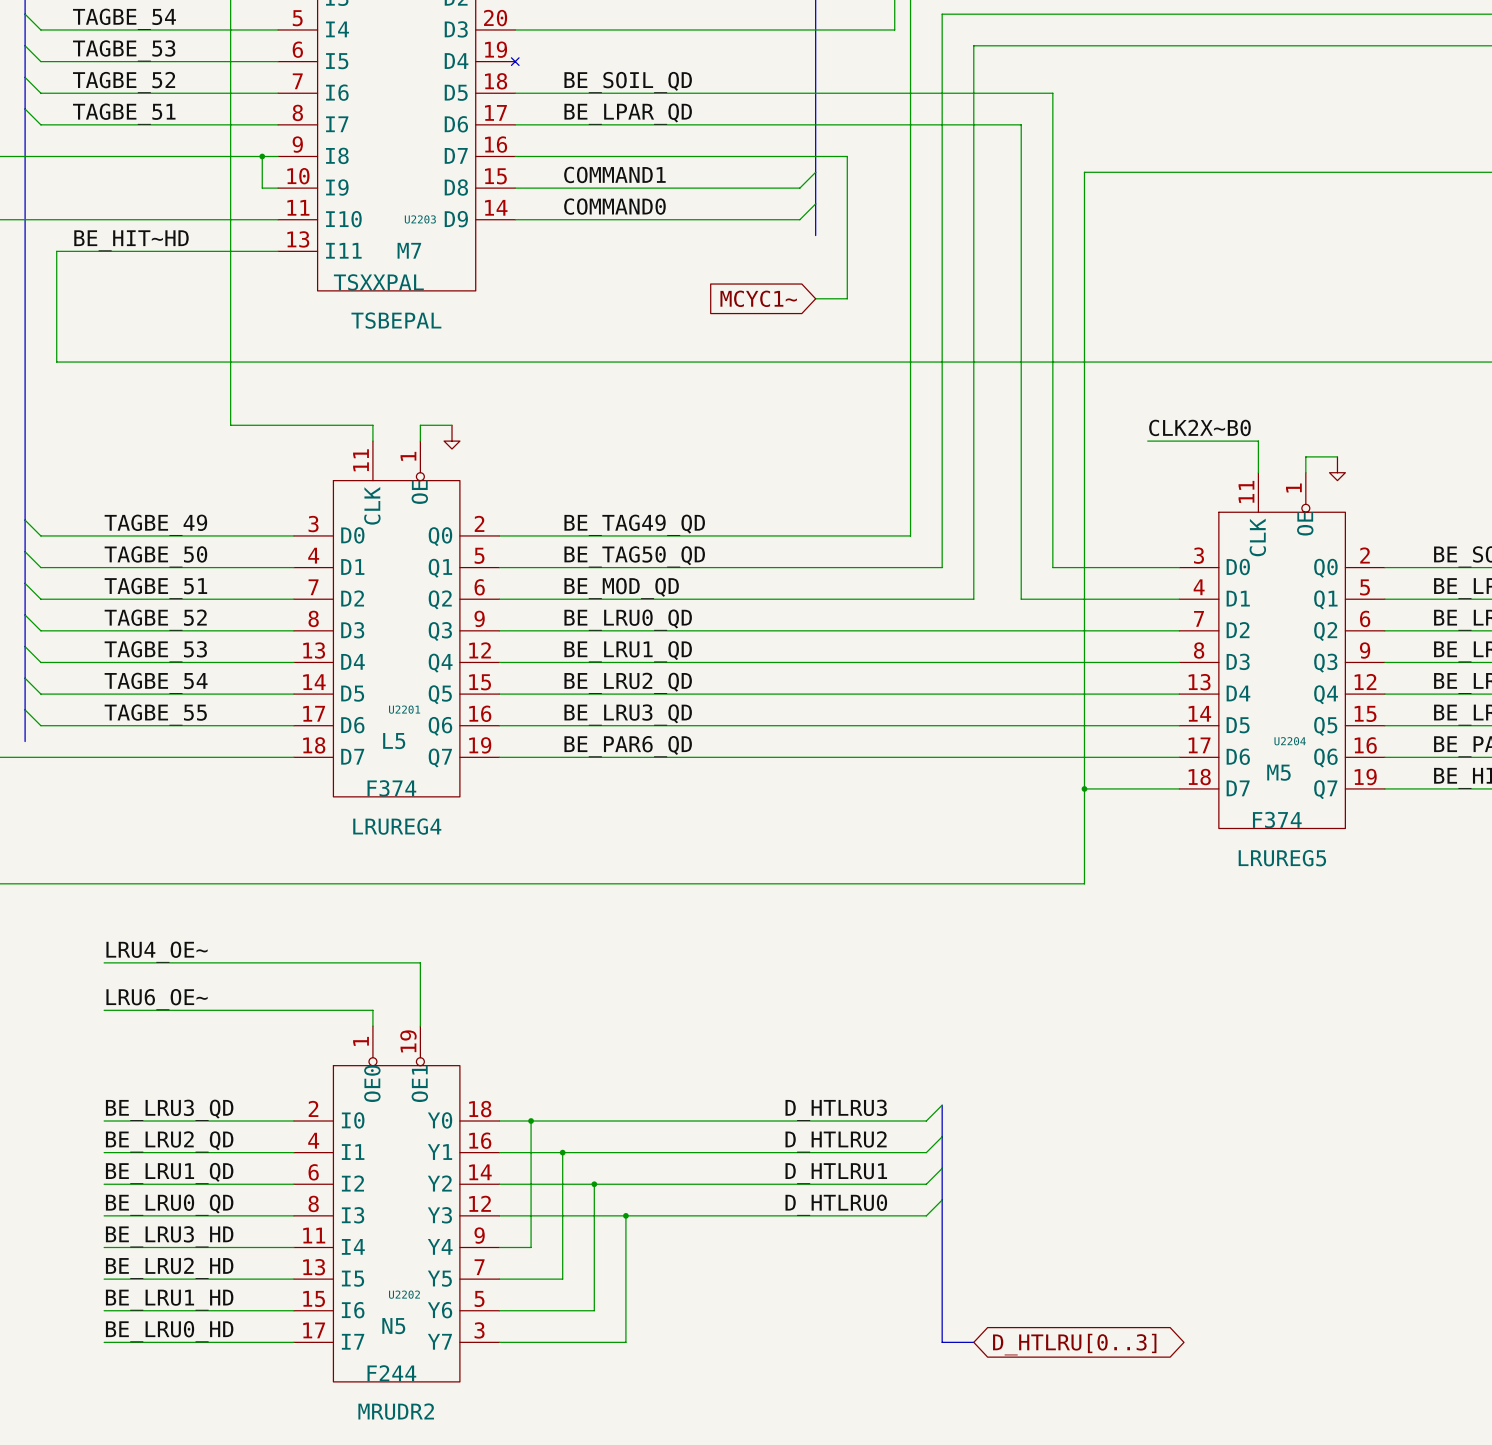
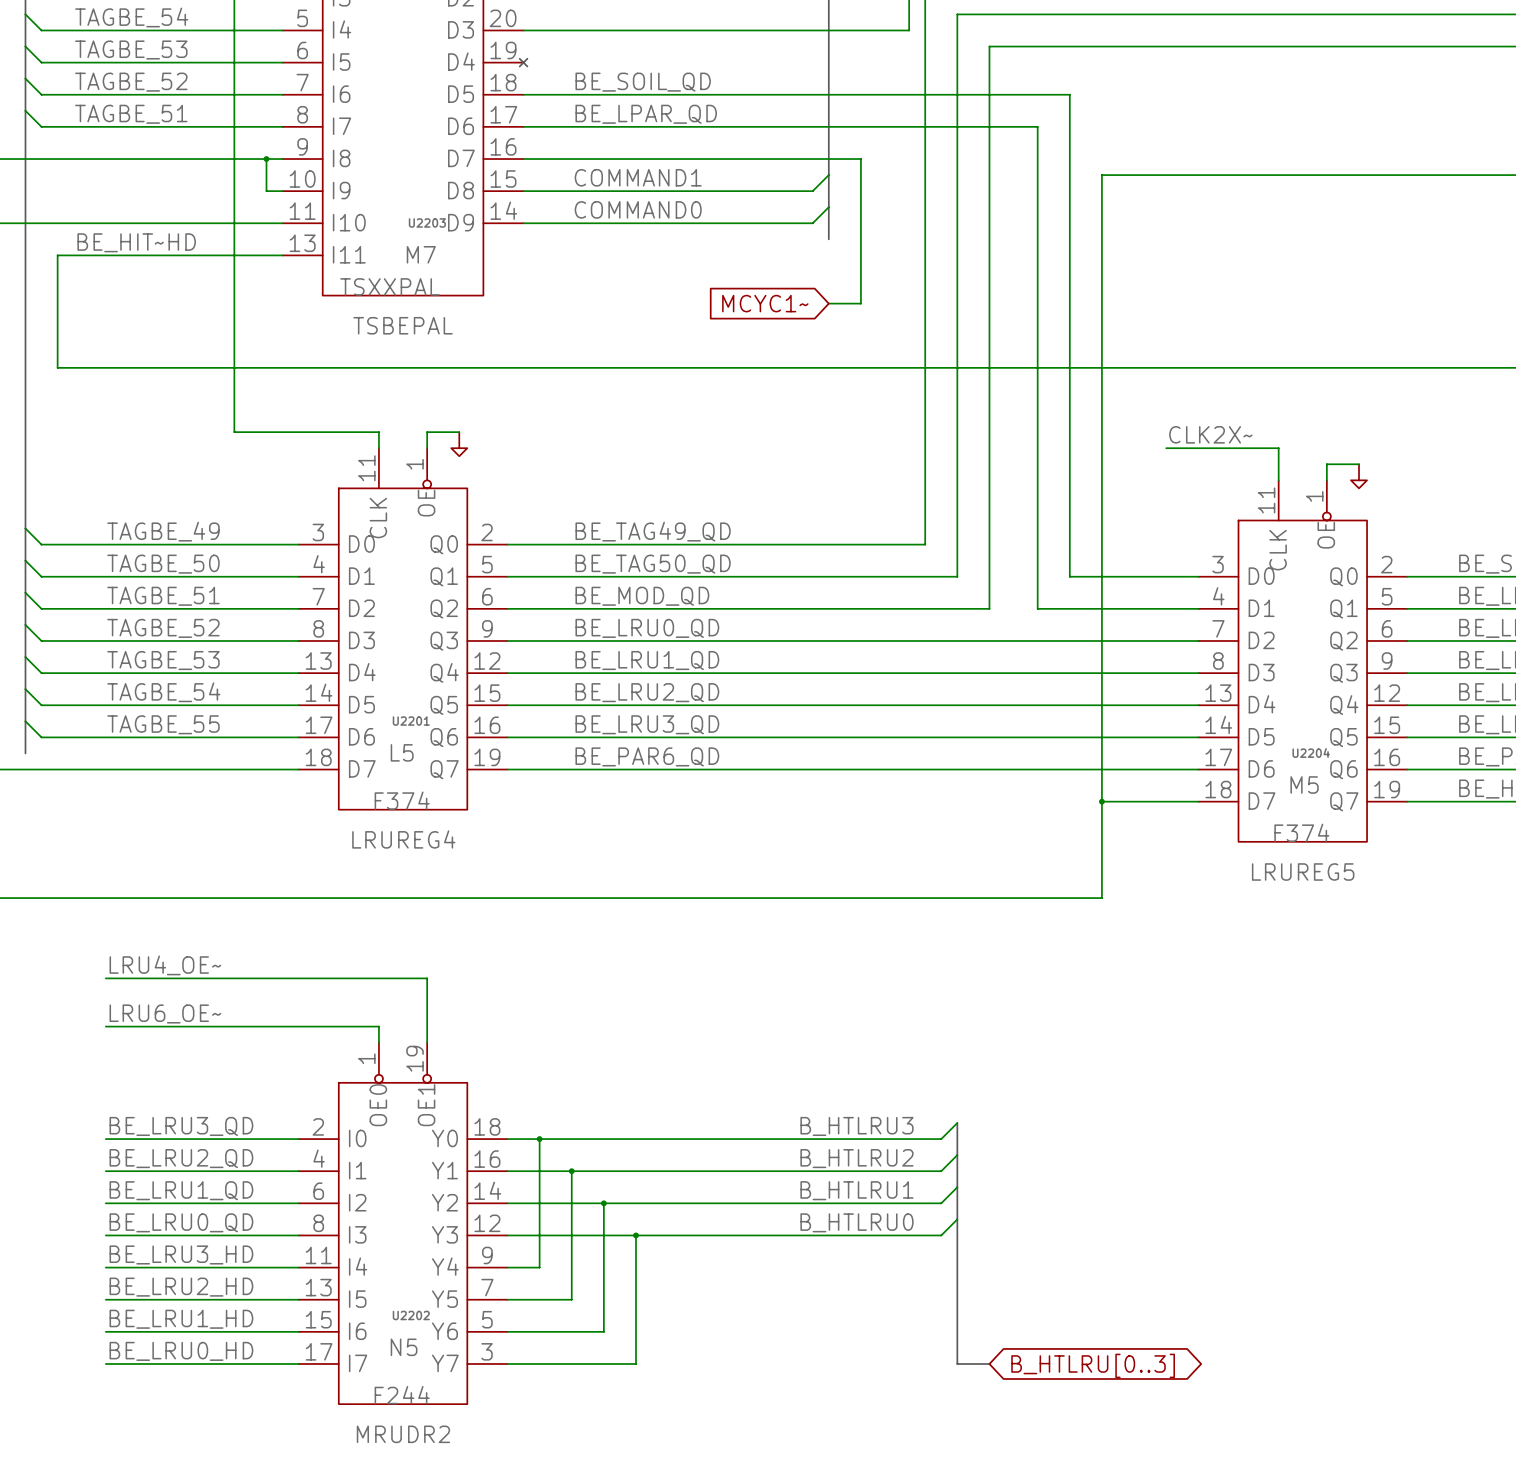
label: CLK2X~B0 (1199, 427) -> CLK2X~ (1210, 434)
label: D_HTLRU3 (836, 1110) -> B_HTLRU3 (856, 1126)
label: D_HTLRU2 (836, 1141) -> B_HTLRU2 (856, 1158)
label: D_HTLRU1 (836, 1173) -> B_HTLRU1 (856, 1190)
label: D_HTLRU0 (836, 1205) -> B_HTLRU0 (856, 1222)
global label: D_HTLRU[0..3] (1074, 1344) -> B_HTLRU[0..3] (1093, 1365)

